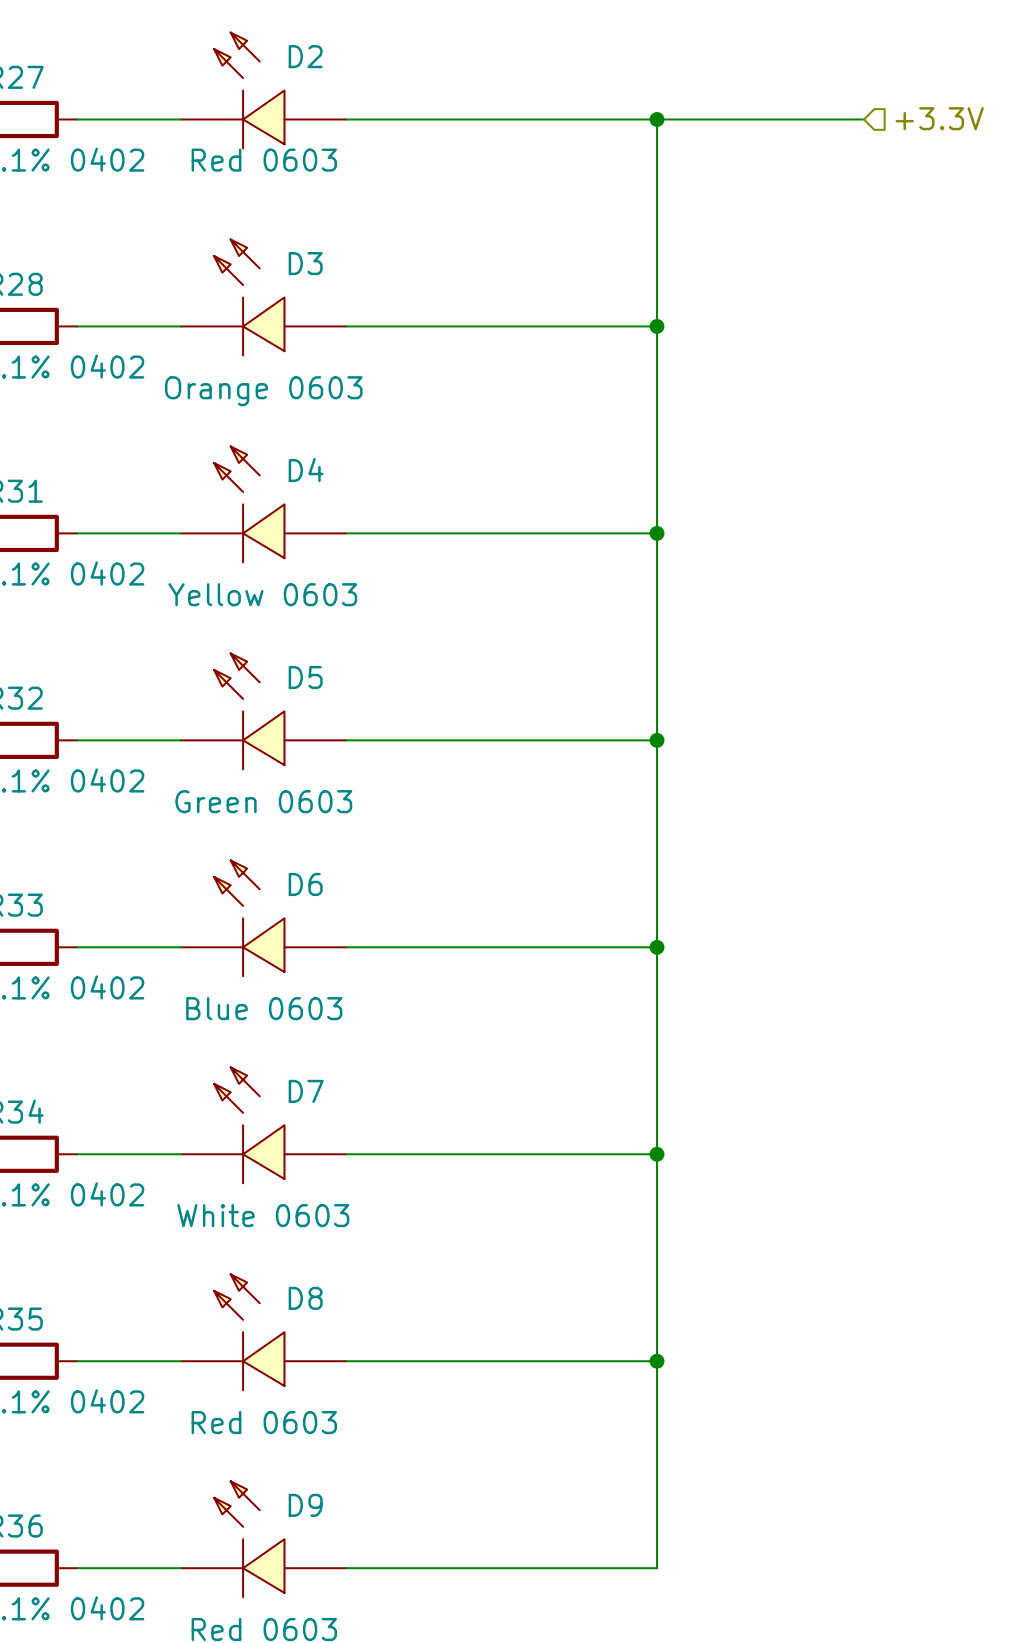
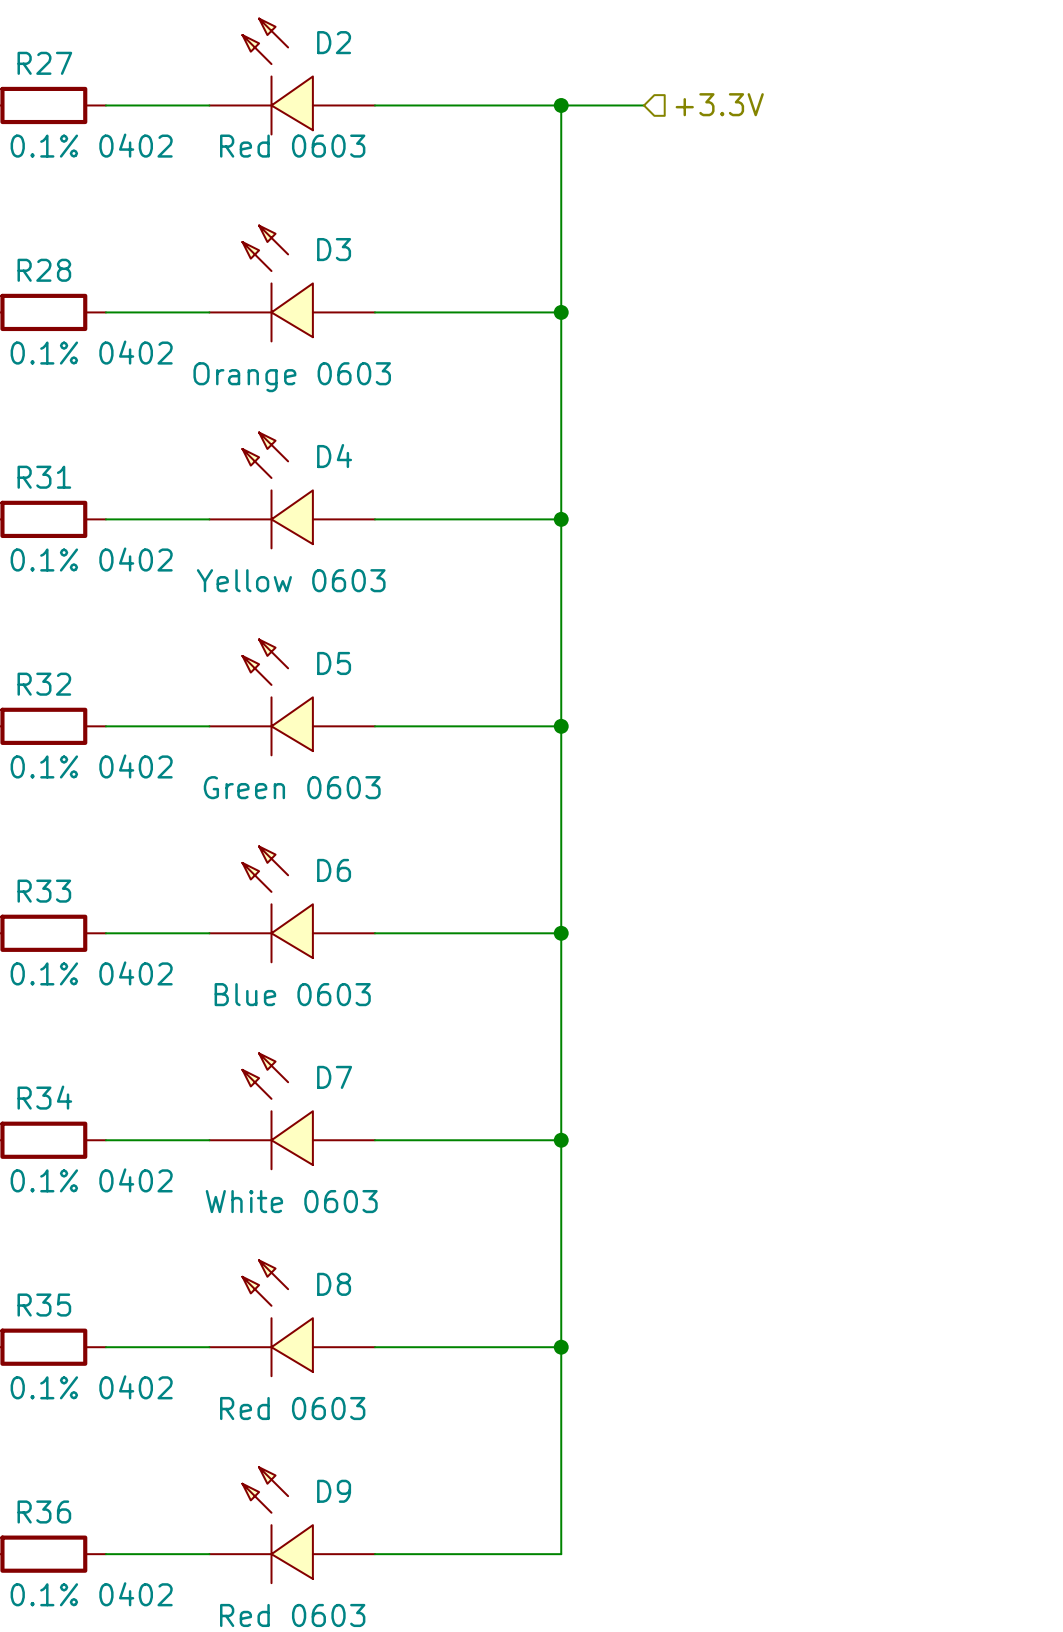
hierarchical label position: +3.3V (939, 118) -> +3.3V (719, 104)
junction: none -> (561, 105)
wire: (615, 119) (863, 119) -> none
wire: (657, 119) (657, 1568) (532, 1568) -> (561, 105) (561, 1554)
junction: (657, 119) -> none
wire: (532, 326) (657, 326) -> none
junction: none -> (561, 312)
junction: (657, 326) -> none
wire: (532, 533) (657, 533) -> none
junction: none -> (561, 519)
junction: (657, 533) -> none
wire: (532, 740) (657, 740) -> none
junction: none -> (561, 726)
junction: (657, 740) -> none
wire: (532, 947) (657, 947) -> none
junction: none -> (561, 933)
junction: (657, 947) -> none
wire: (532, 1154) (657, 1154) -> none
junction: none -> (561, 1140)
junction: (657, 1154) -> none
wire: (532, 1361) (657, 1361) -> none
junction: none -> (561, 1347)
junction: (657, 1361) -> none

